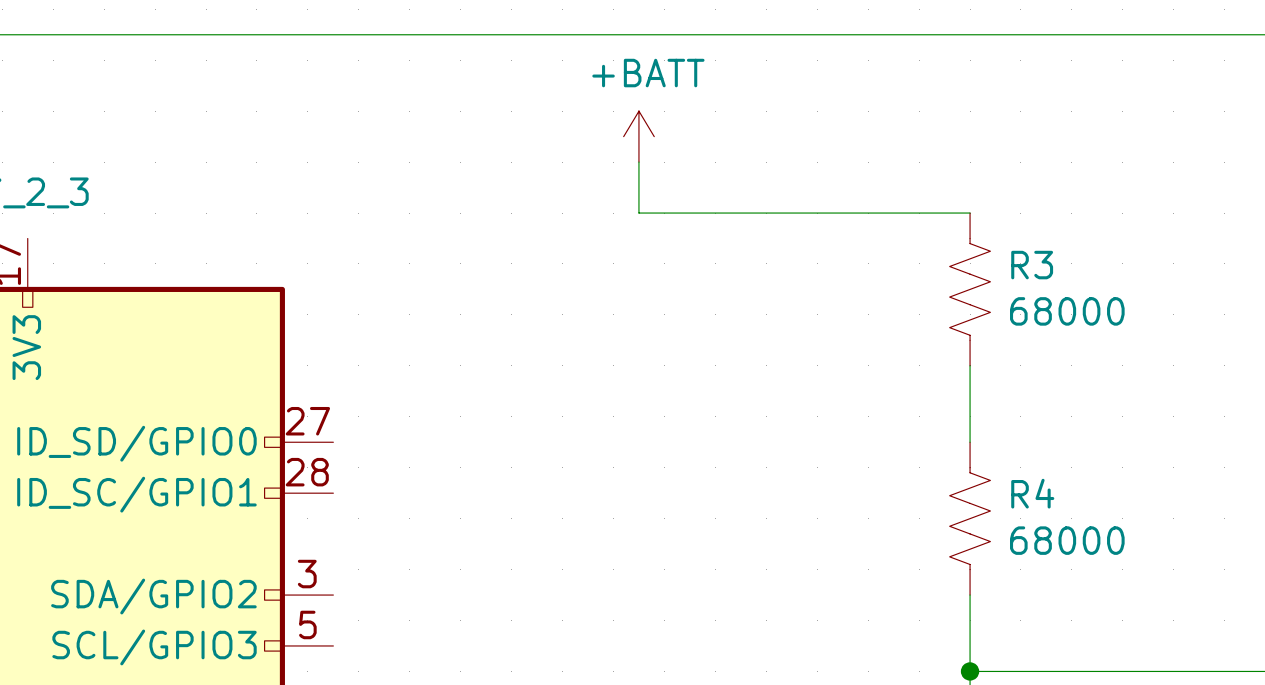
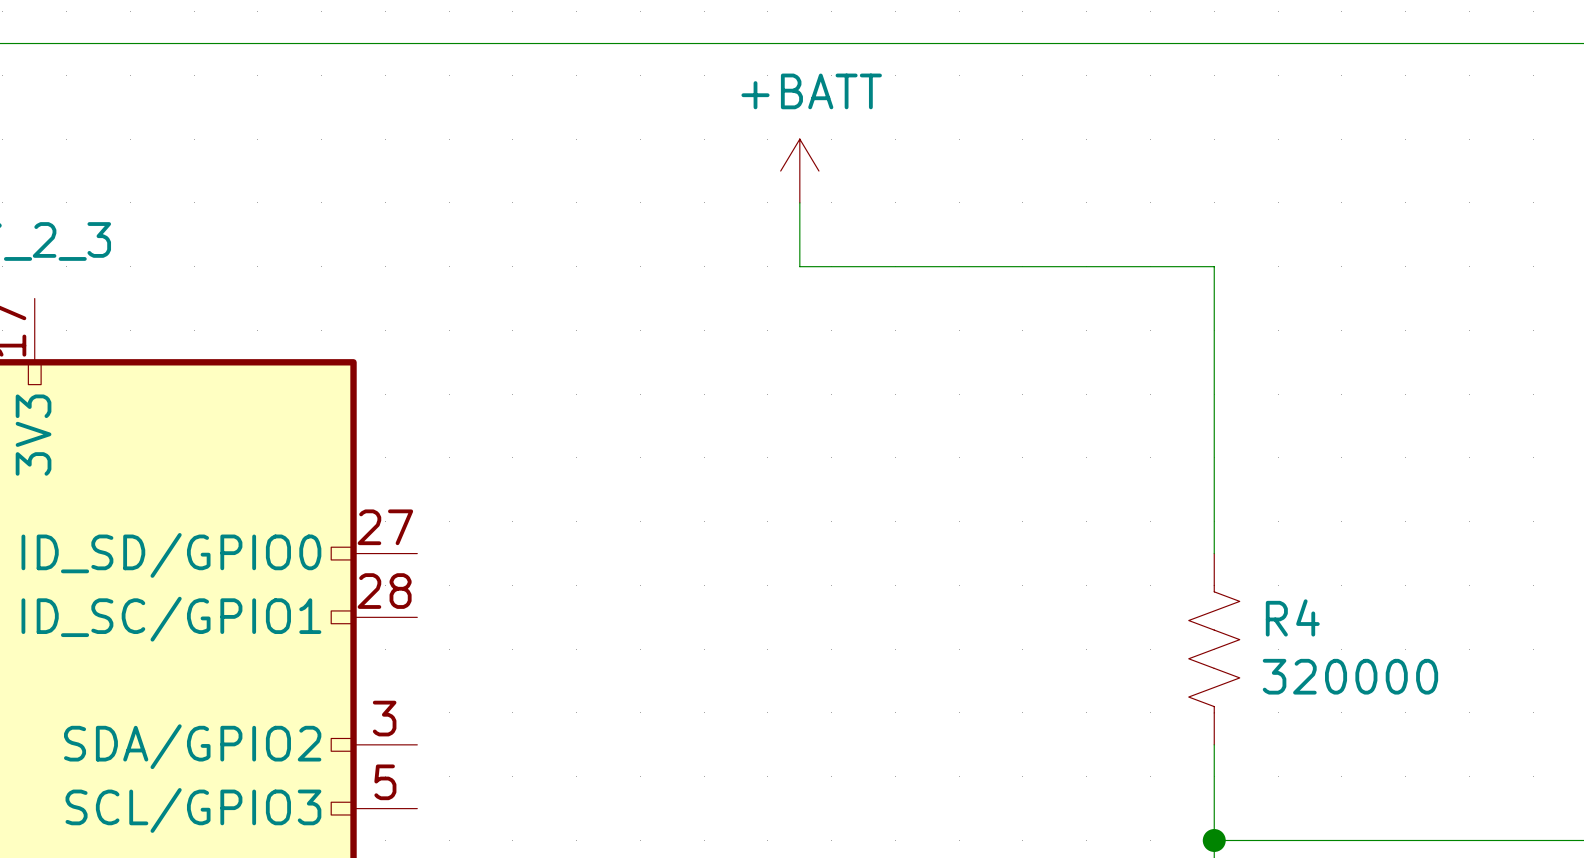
wire: none -> (1214, 266) (1214, 457)
R3: 68000 (970, 289) -> none
R4 value: 68000 (1067, 540) -> 320000 (1350, 676)

